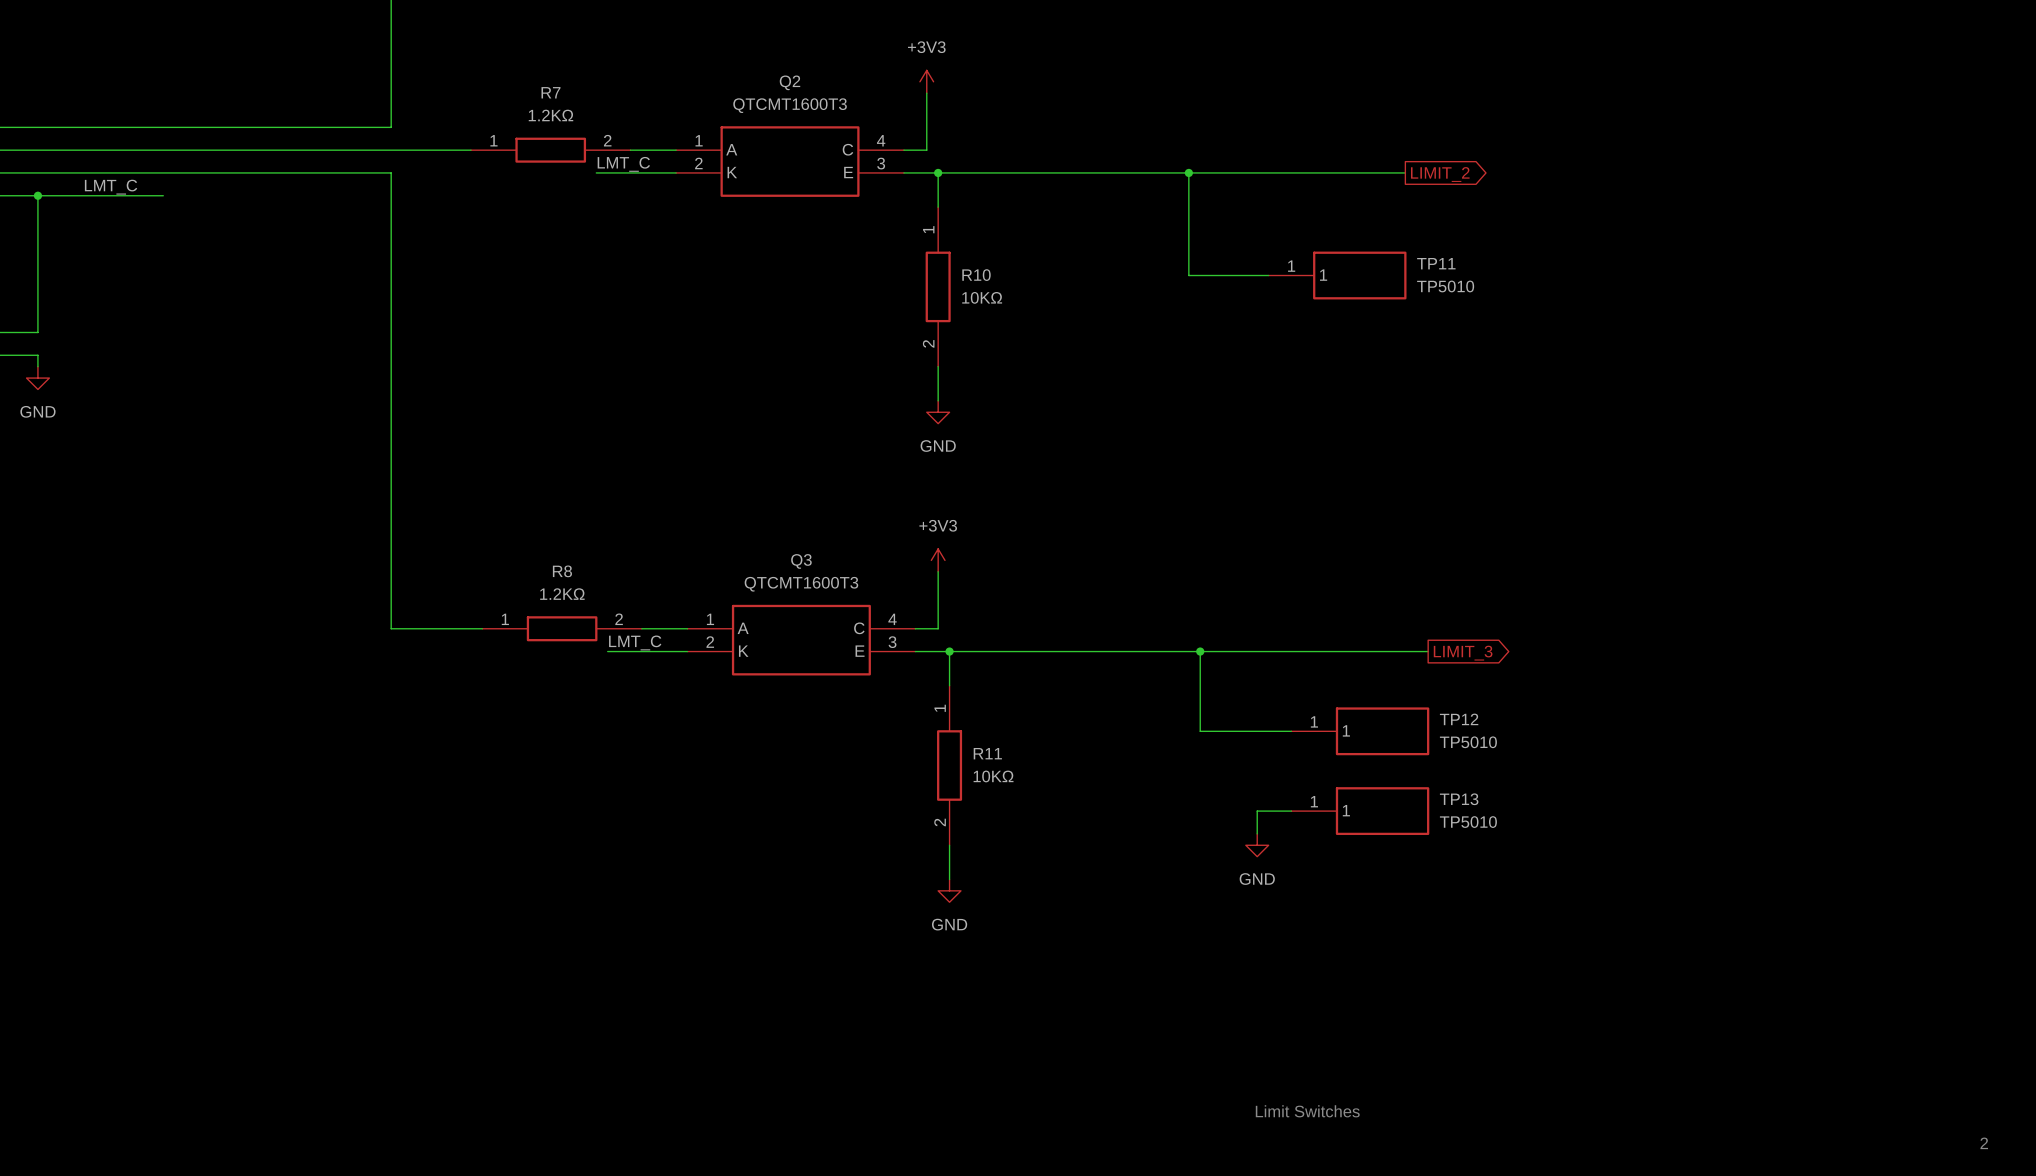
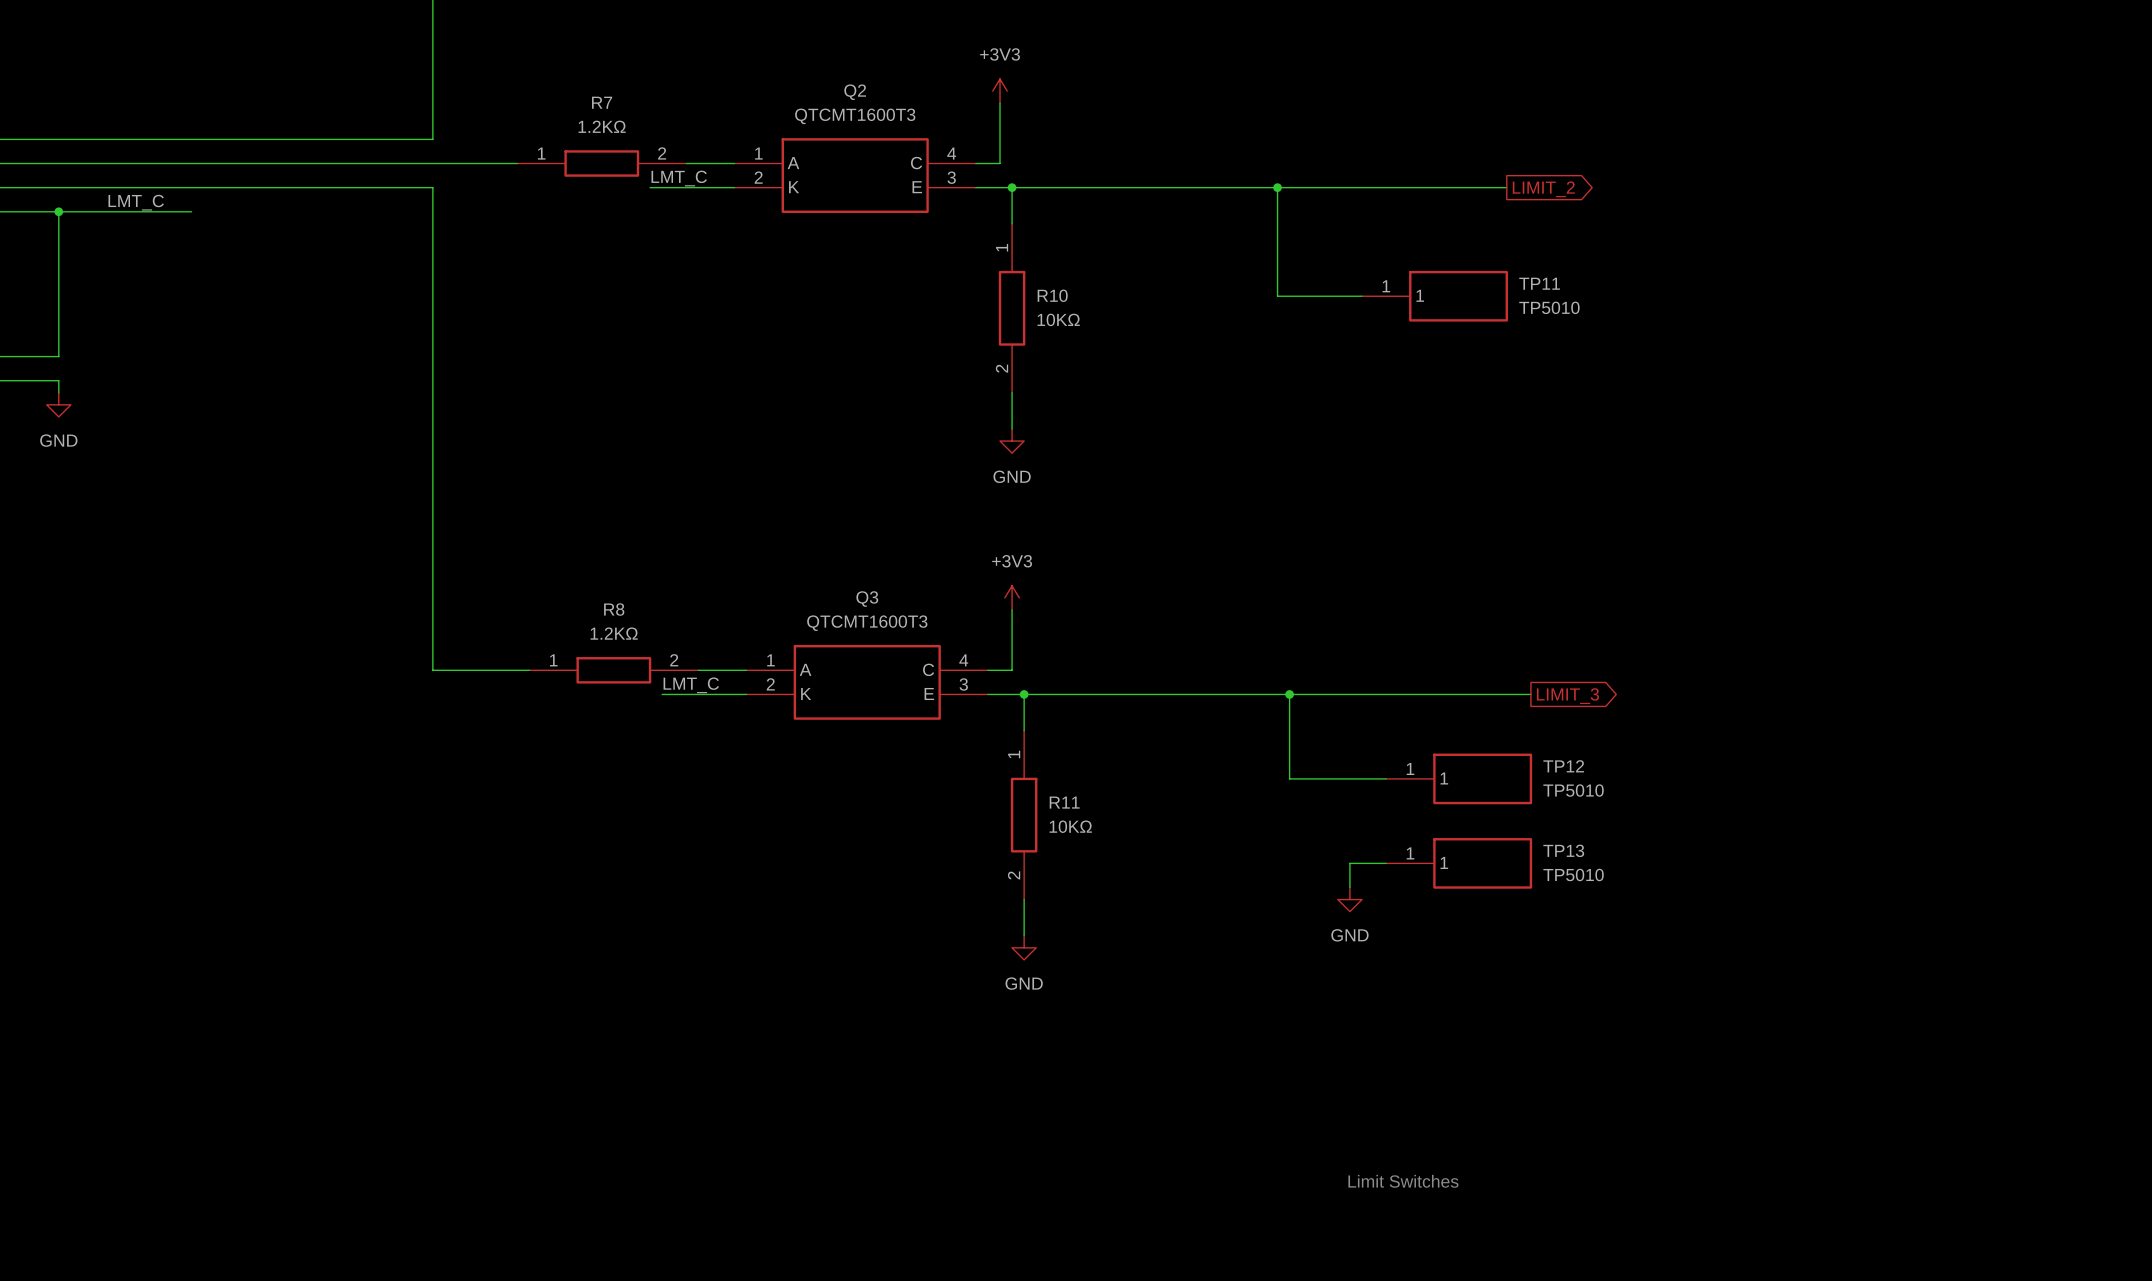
text: 2 (1984, 1143) -> none

